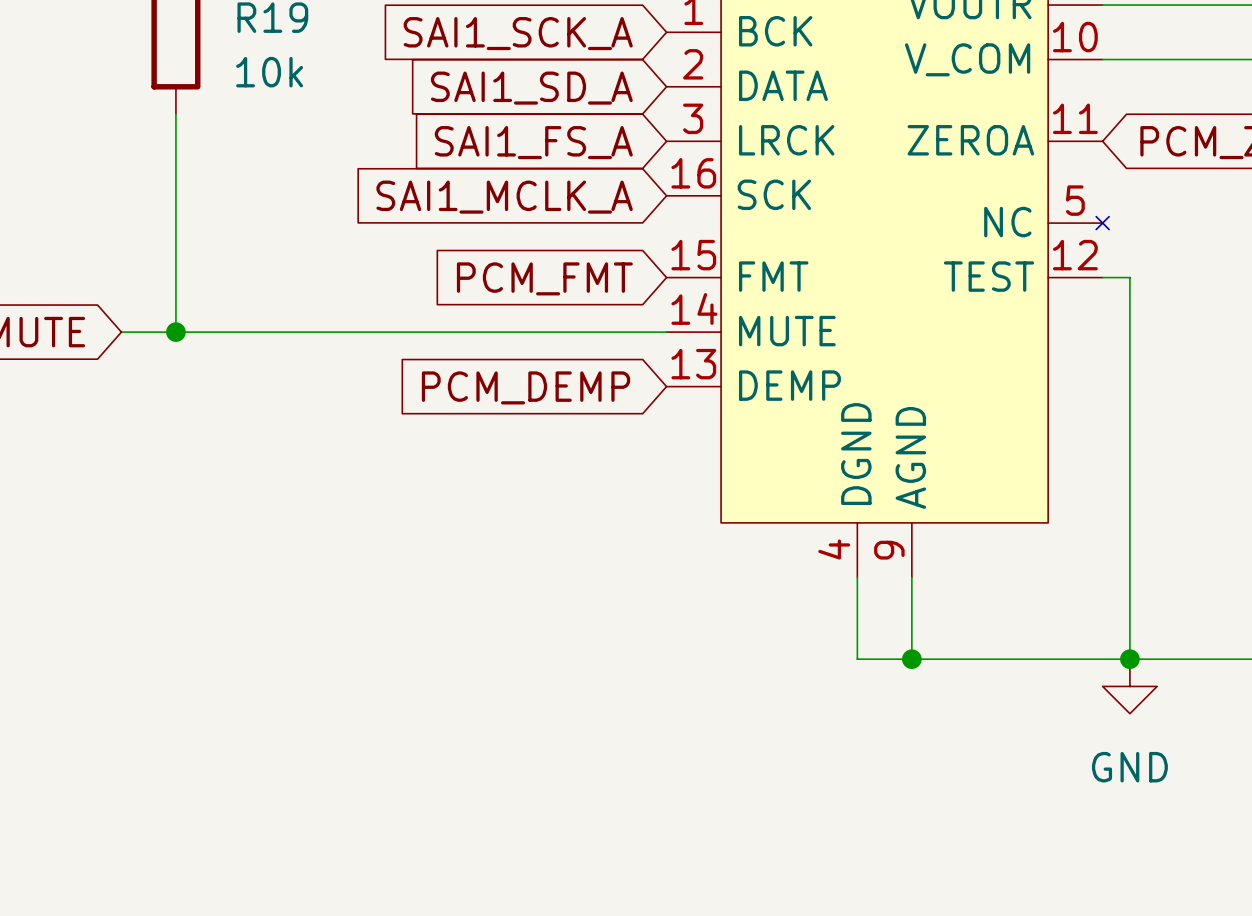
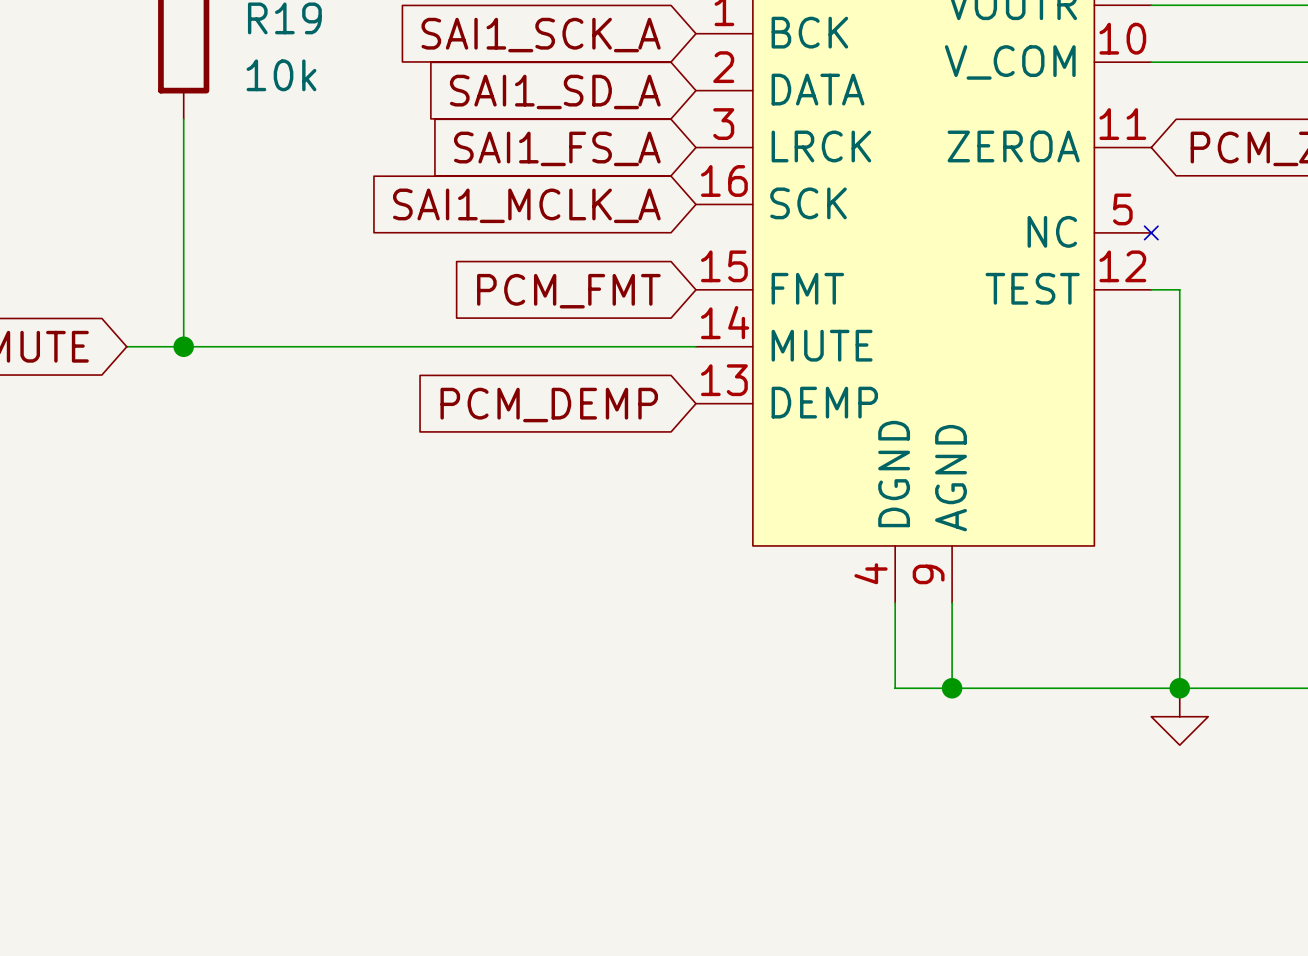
power symbol text: GND (1129, 767) -> none

